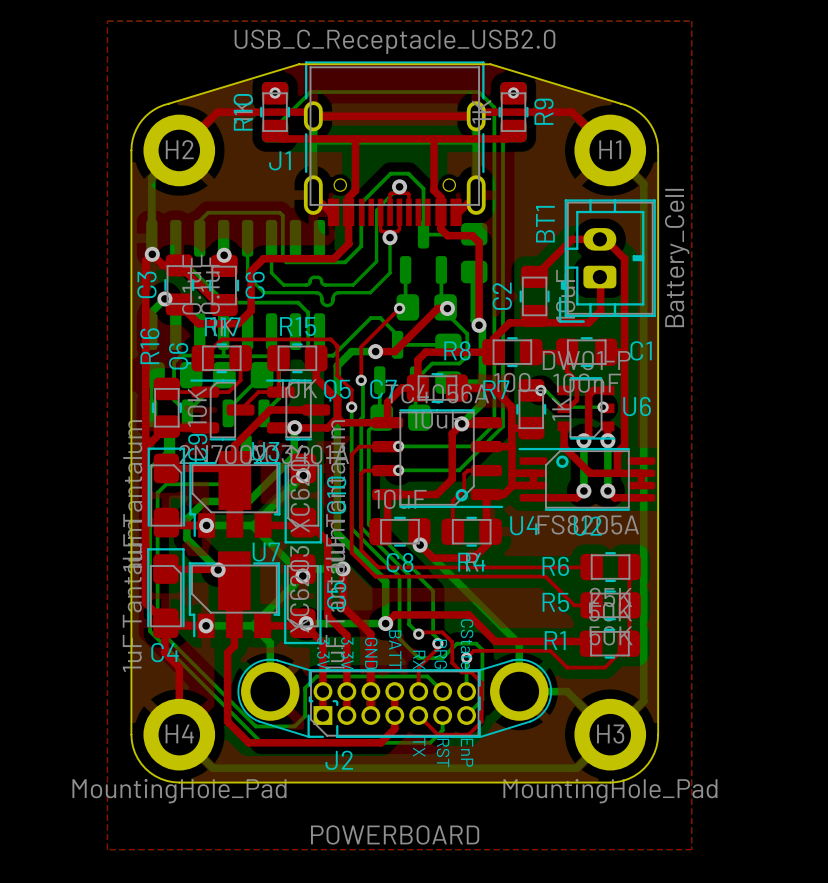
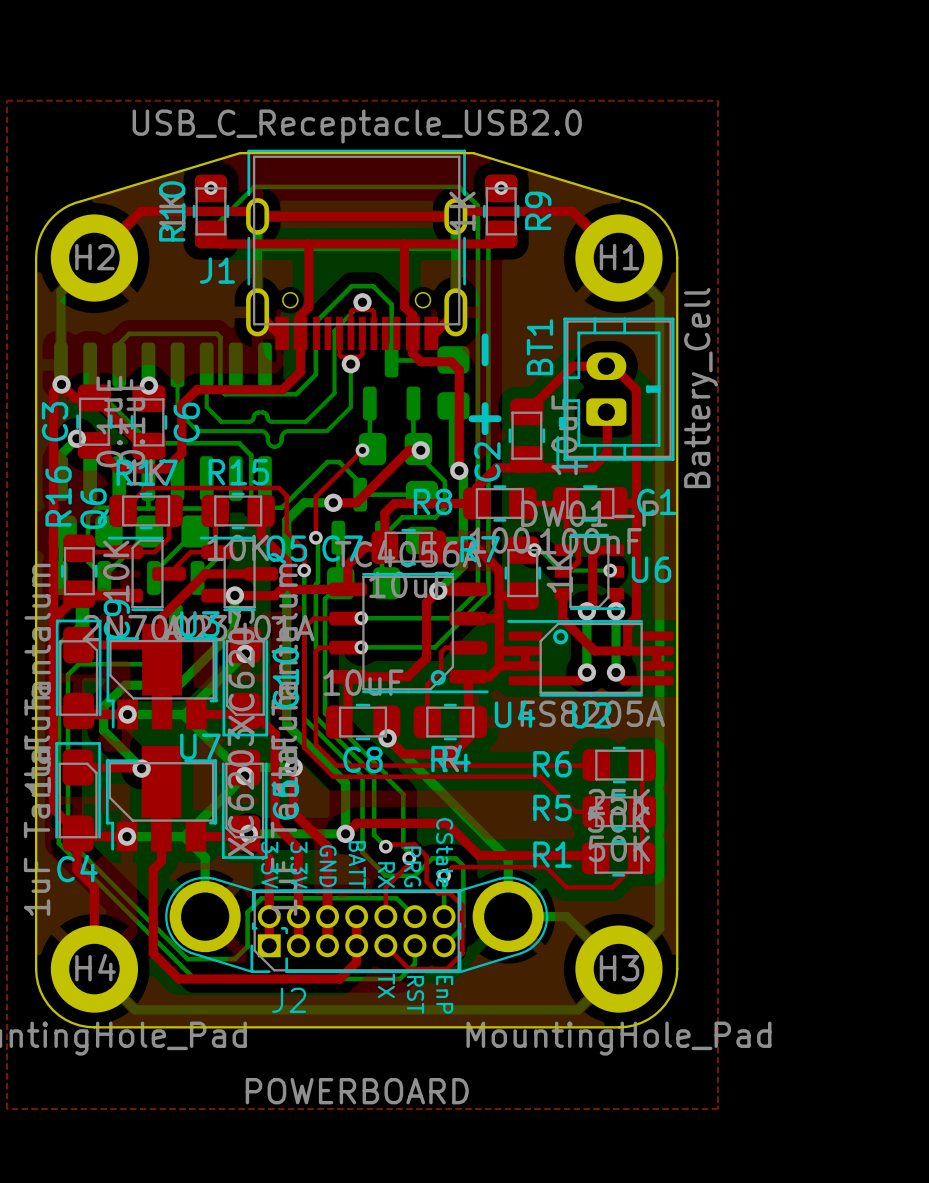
text: none -> + - (485, 384)
C2 name position: C2 (502, 296) -> C2 (487, 462)

